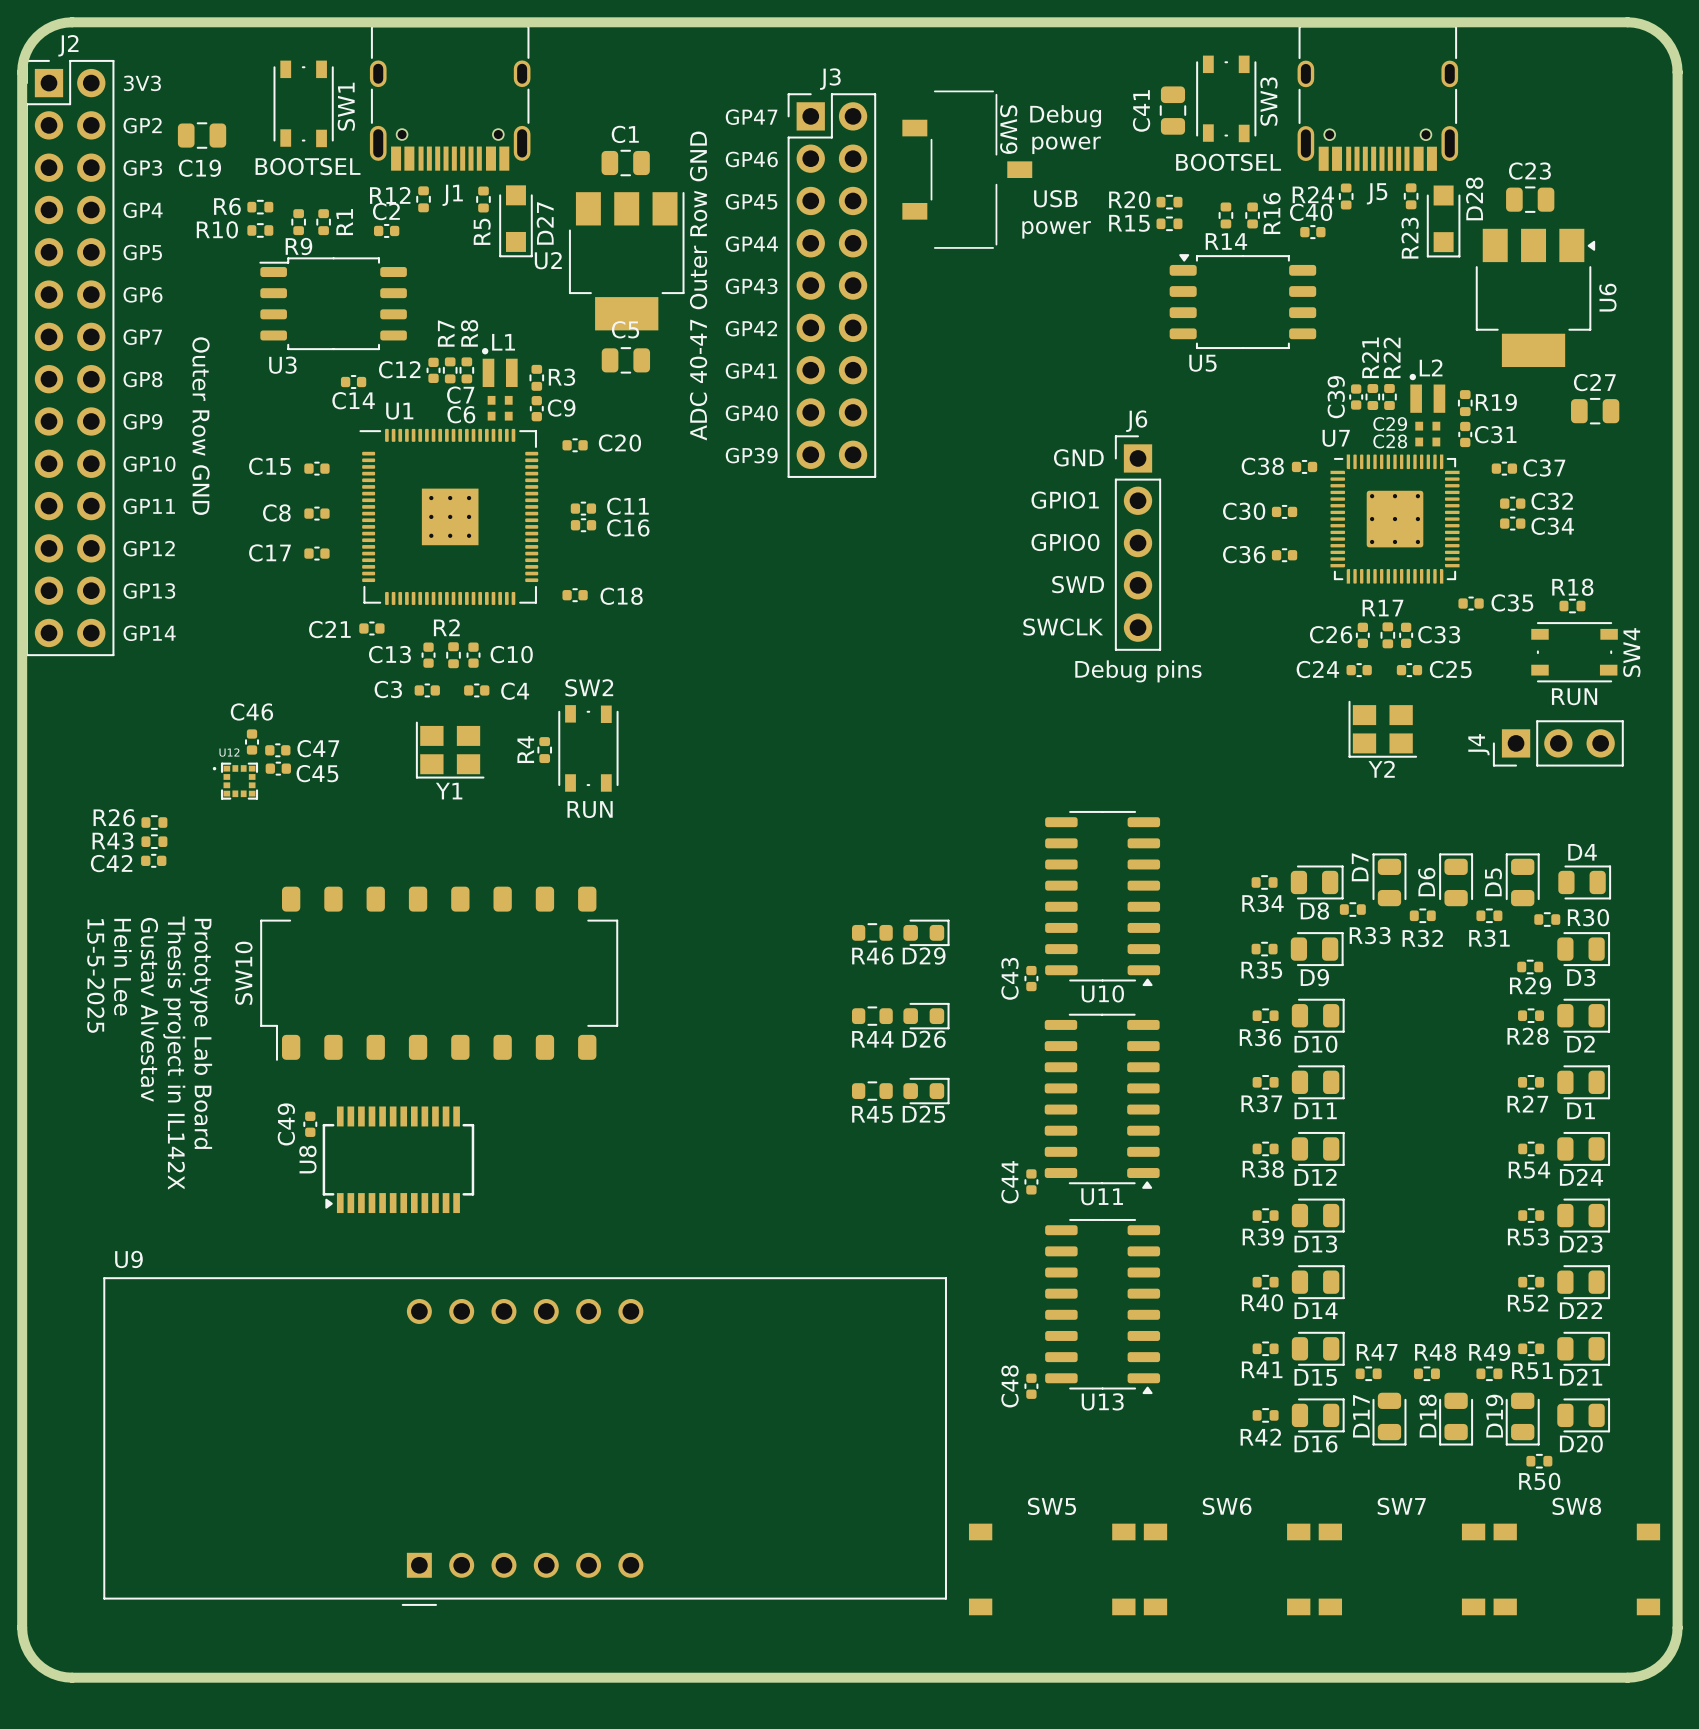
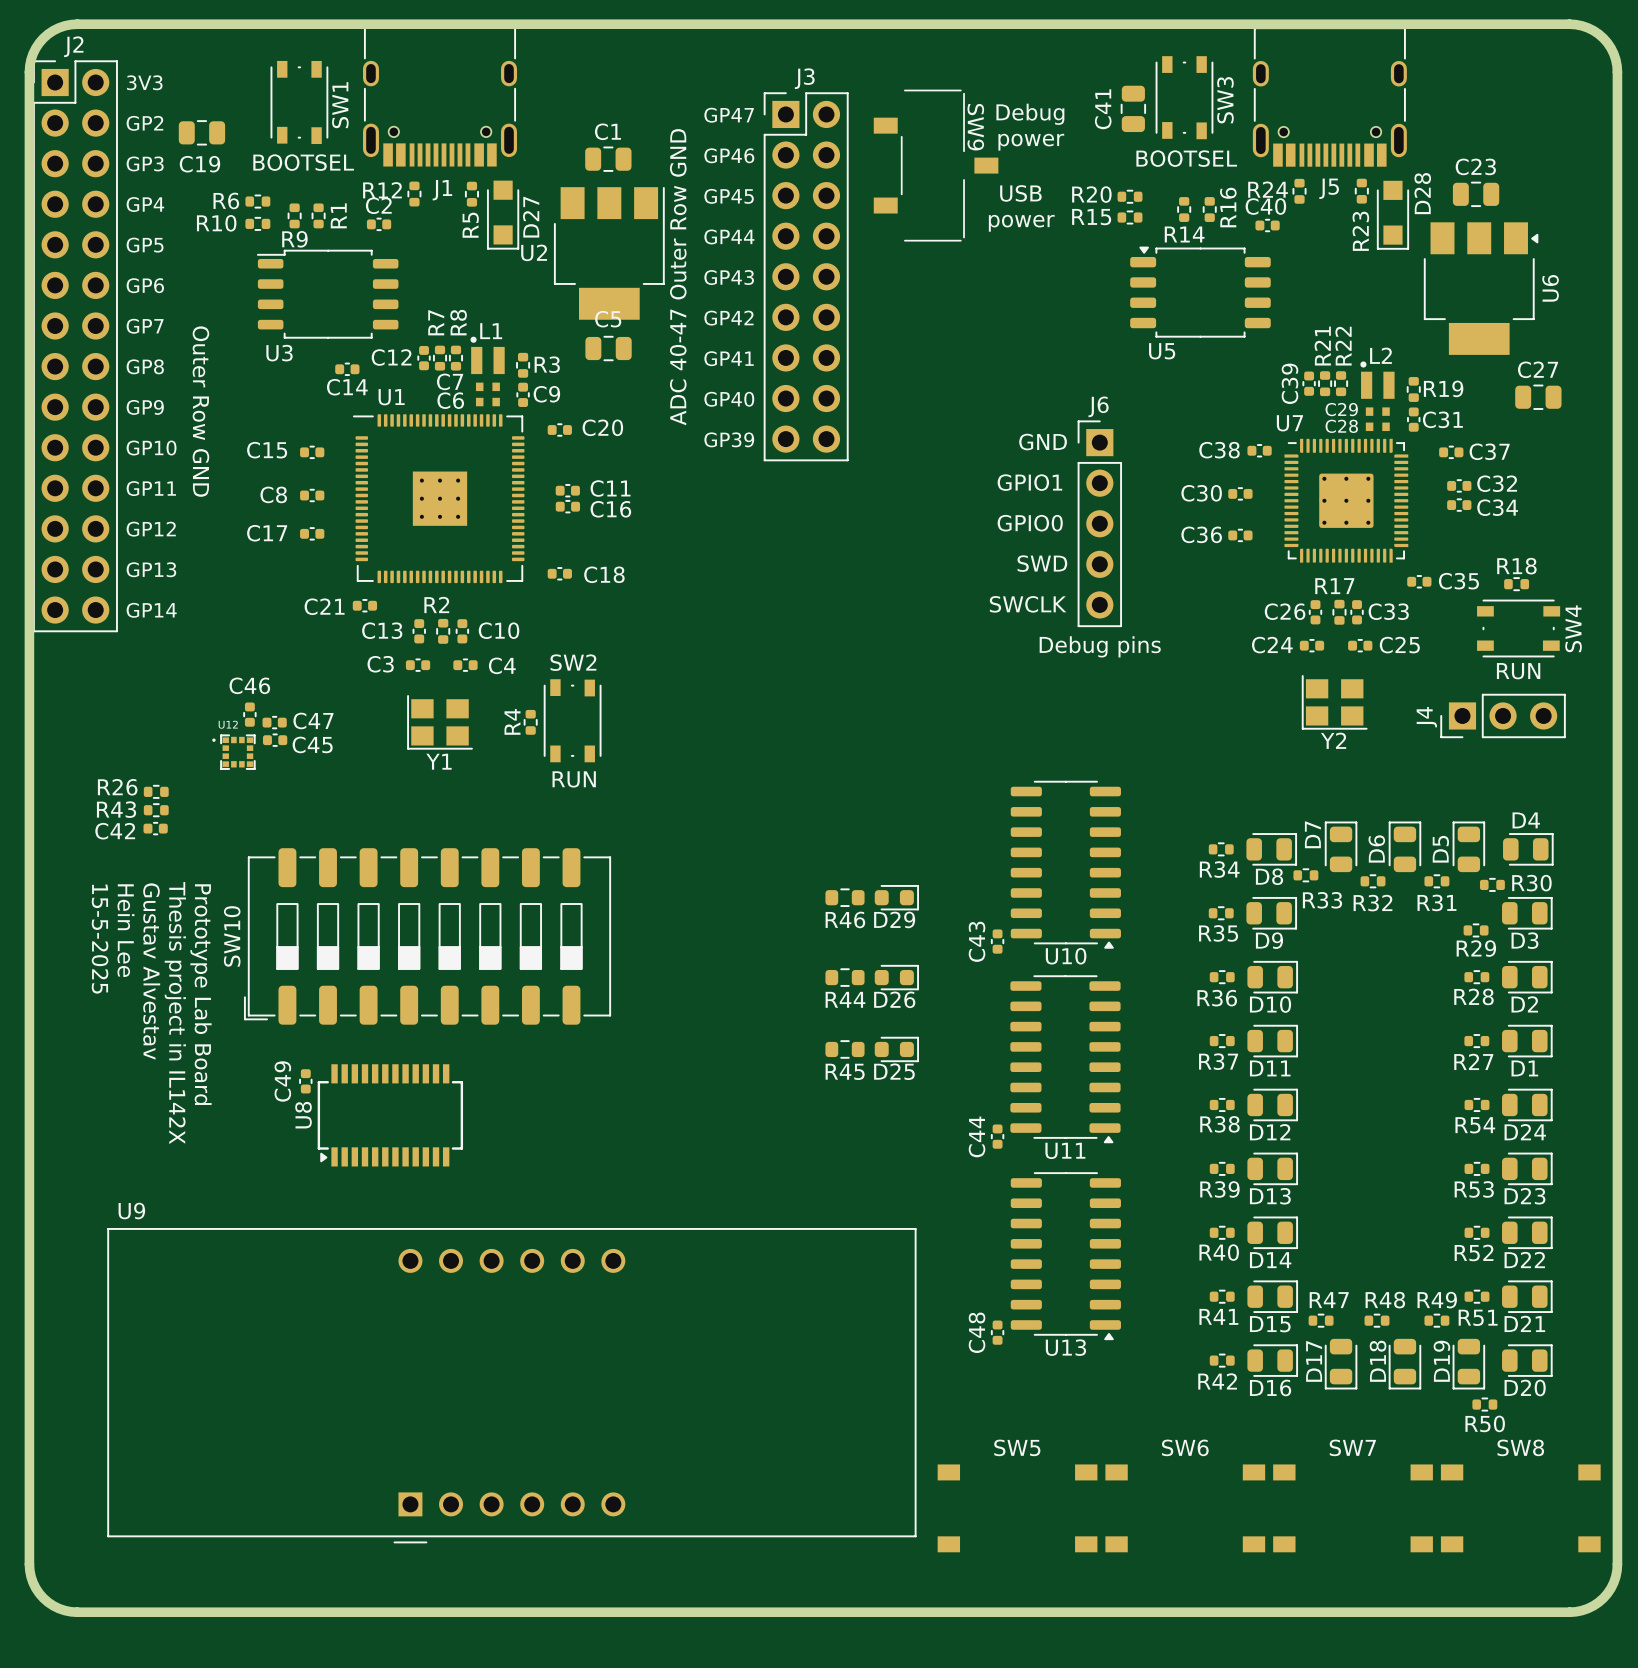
SW10 footprint: [260, 886, 619, 1061] -> [243, 848, 612, 1025]

